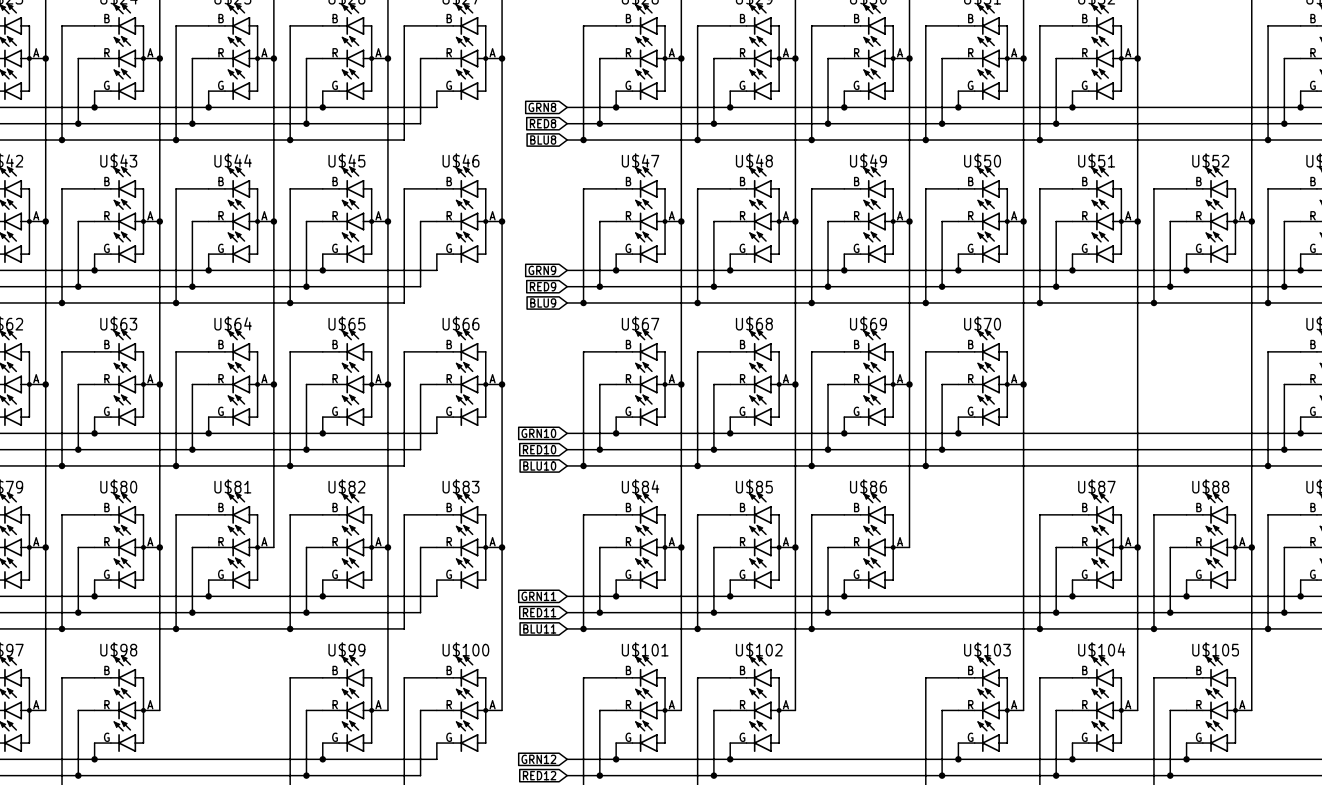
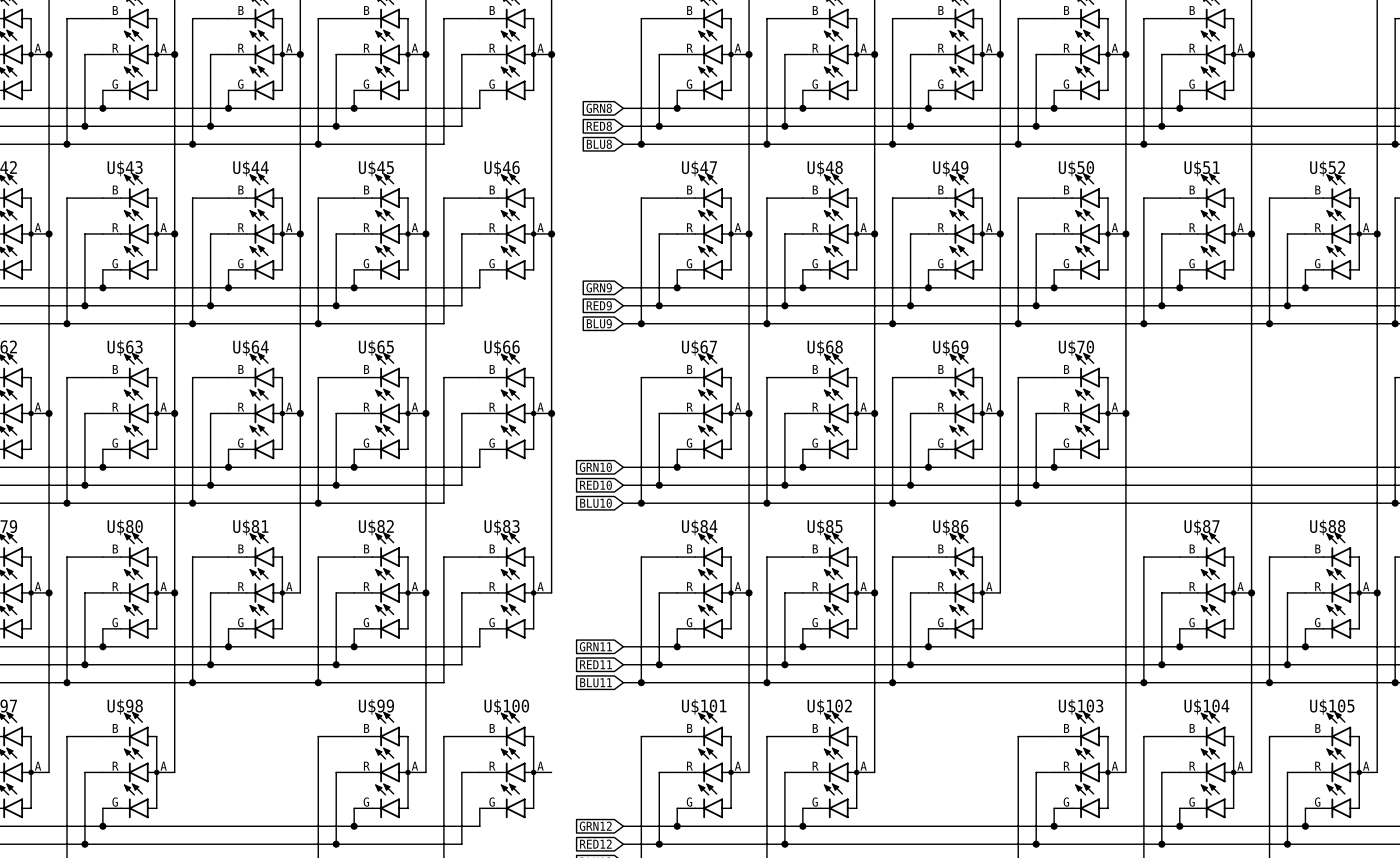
wire: (502, 547) (502, 710) -> none
junction: (502, 547) -> none

